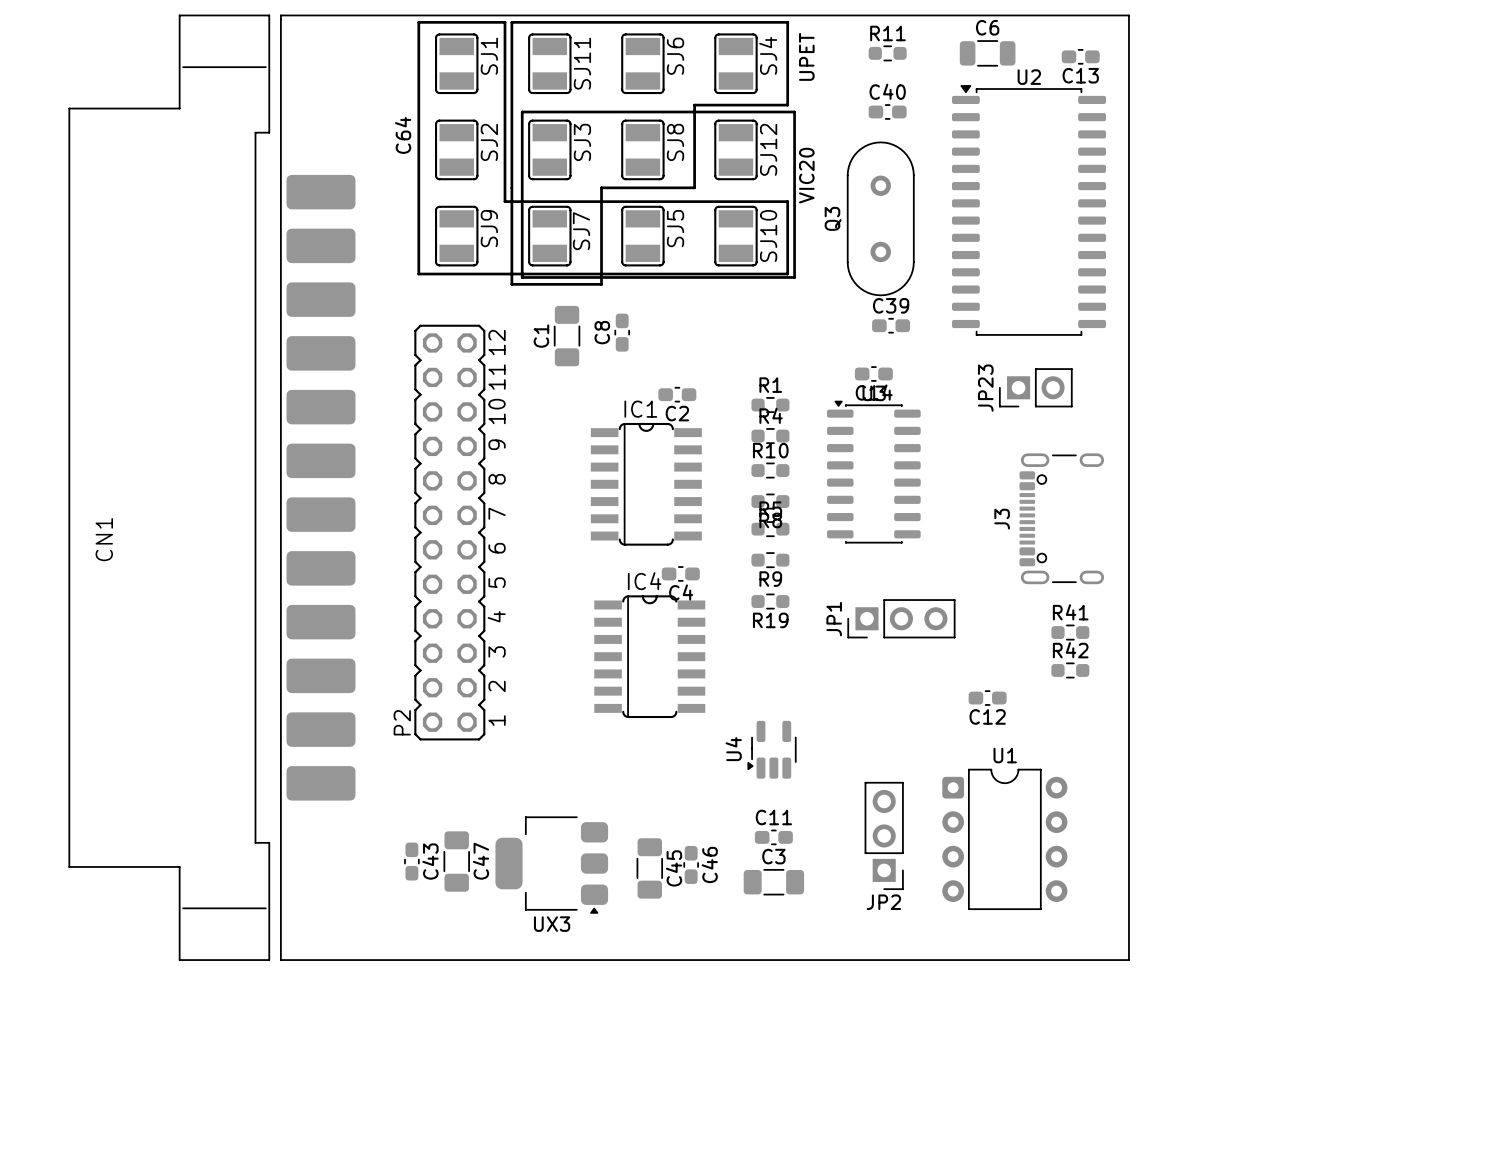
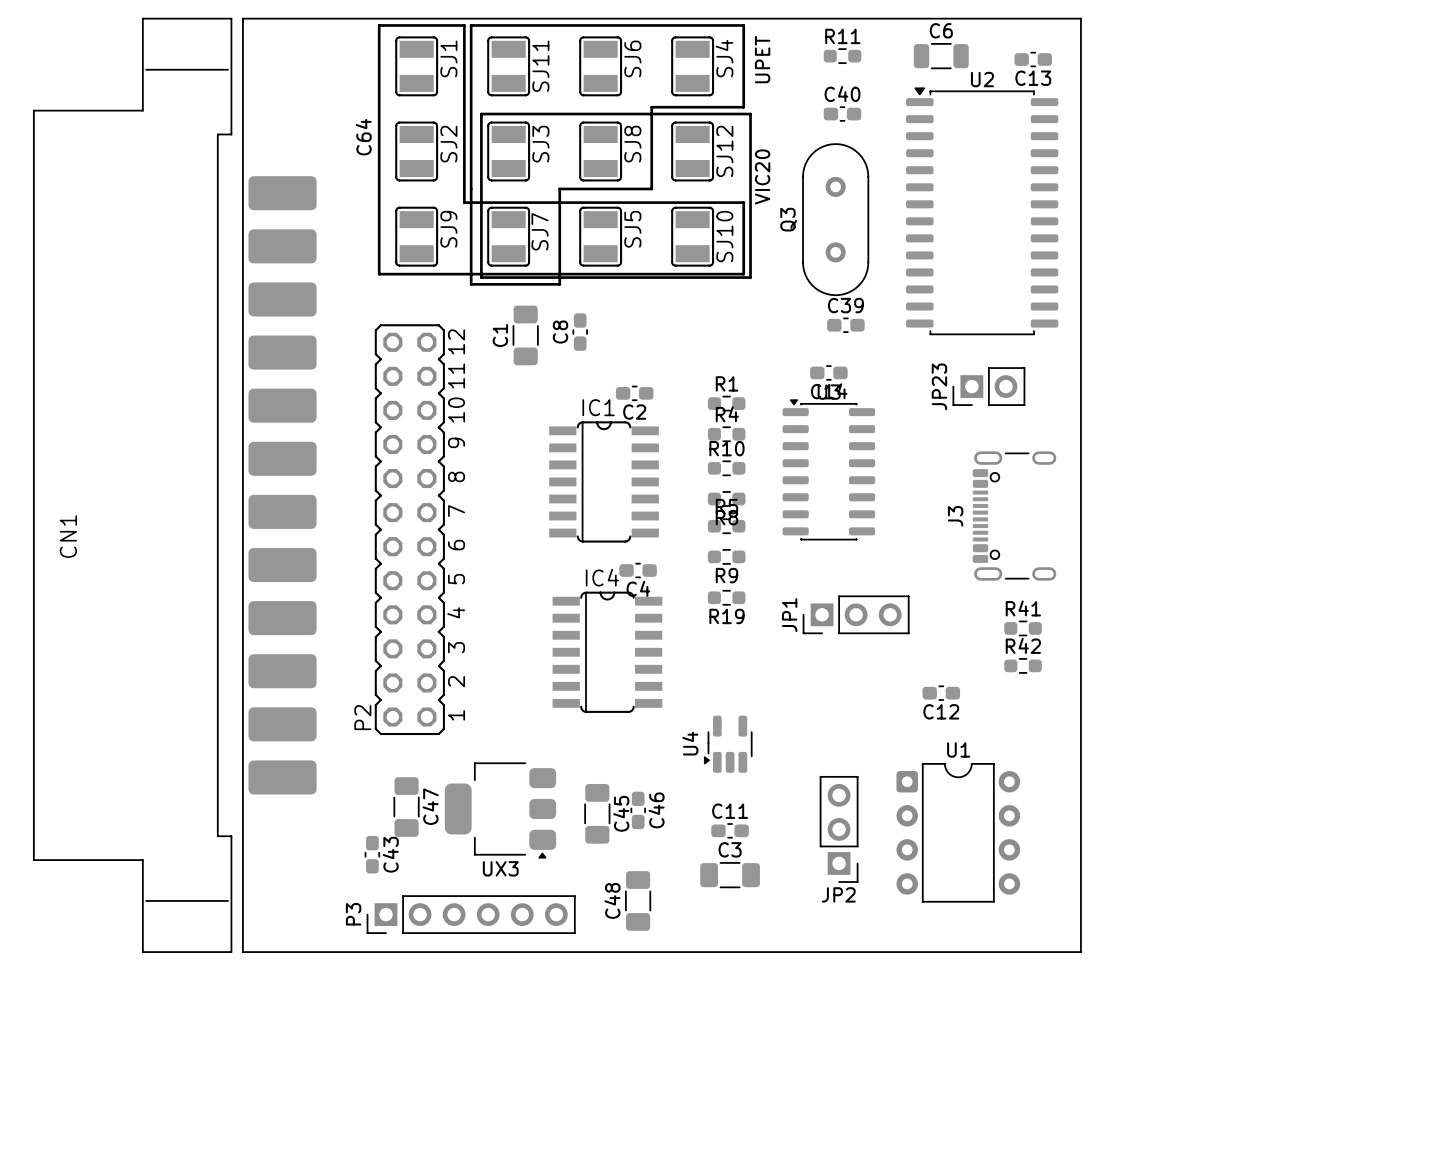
C47 position: (456, 861) -> (406, 807)
C46 position: (691, 864) -> (638, 810)
UX3 position: (551, 865) -> (500, 810)
C45 position: (649, 868) -> (597, 813)
C48: none -> (638, 900)
P3: none -> (471, 914)

